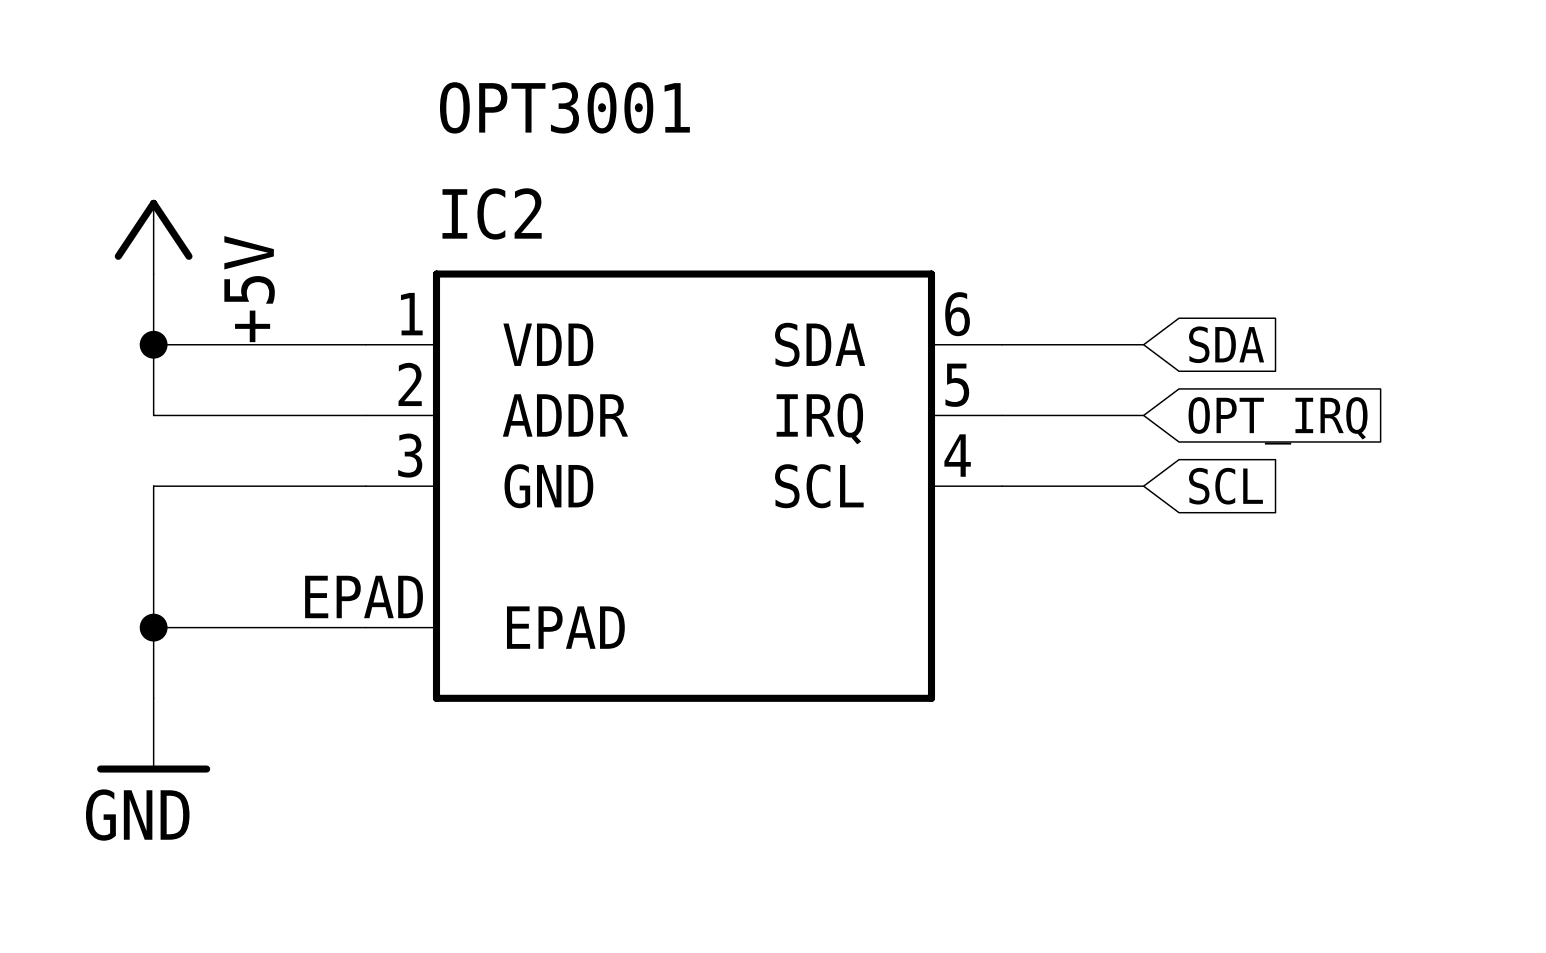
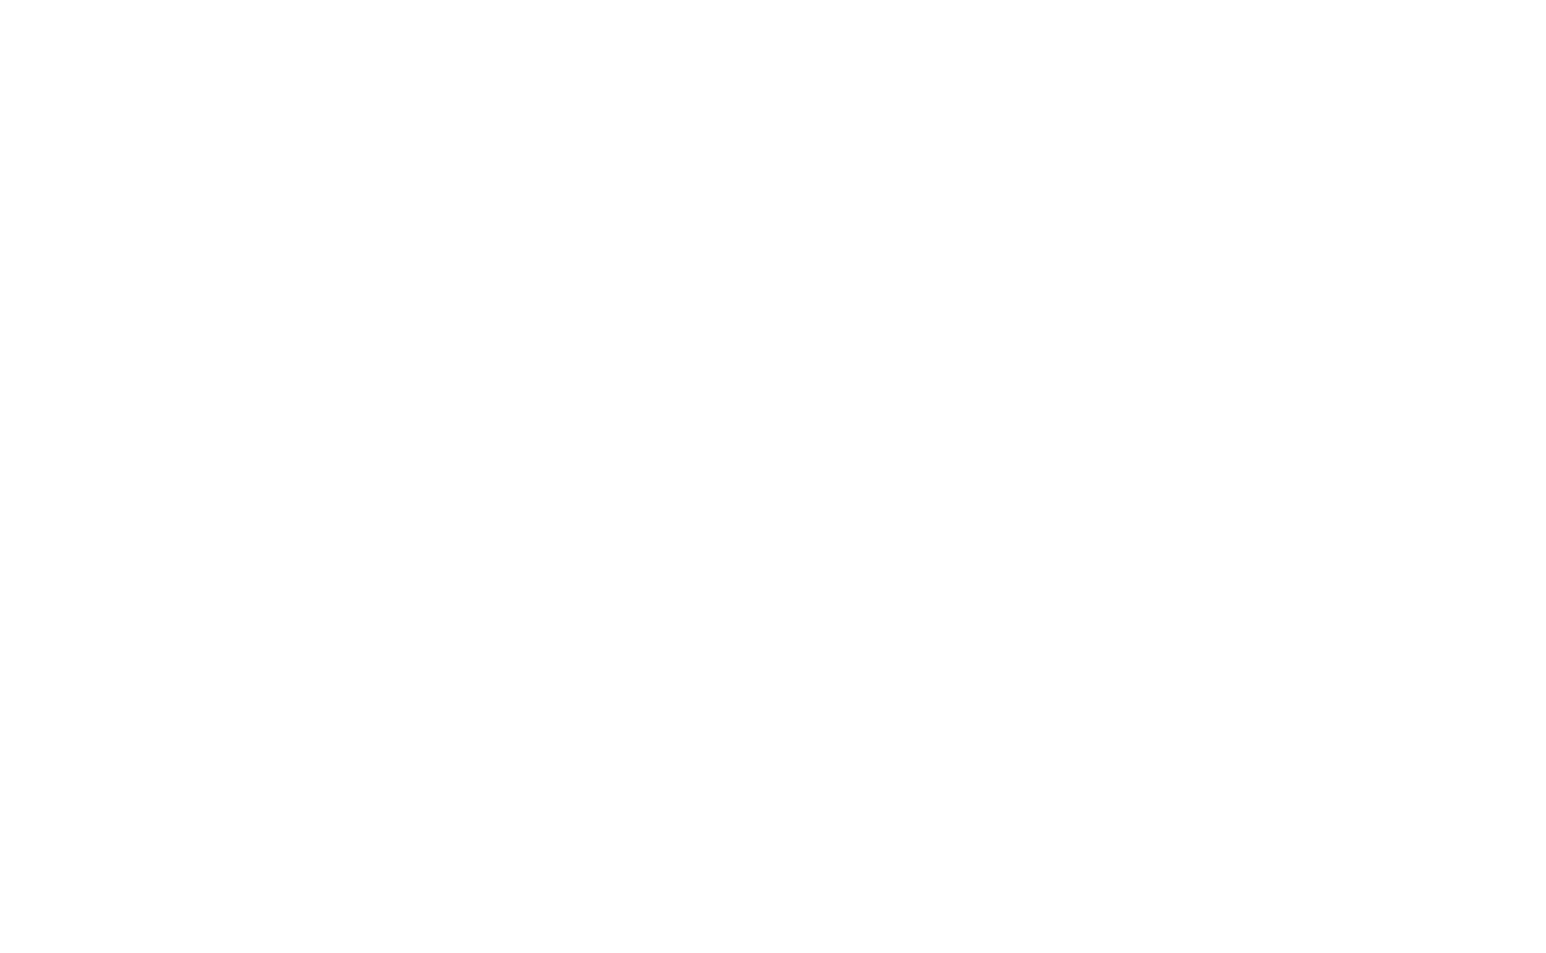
power symbol: +5V (153, 236) -> none
wire: (153, 274) (153, 415) (365, 415) -> none
wire: (153, 344) (365, 344) -> none
junction: (153, 344) -> none
wire: (1002, 344) (1143, 344) -> none
global label: SDA (1226, 344) -> none
wire: (1002, 415) (1143, 415) -> none
global label: OPT_IRQ (1278, 420) -> none
wire: (365, 486) (153, 486) (153, 698) -> none
IC2: OPT3001 (684, 486) -> none
wire: (1002, 486) (1143, 486) -> none
global label: SCL (1225, 486) -> none
wire: (153, 627) (365, 627) -> none
junction: (153, 627) -> none
power symbol: GND (153, 735) -> none

